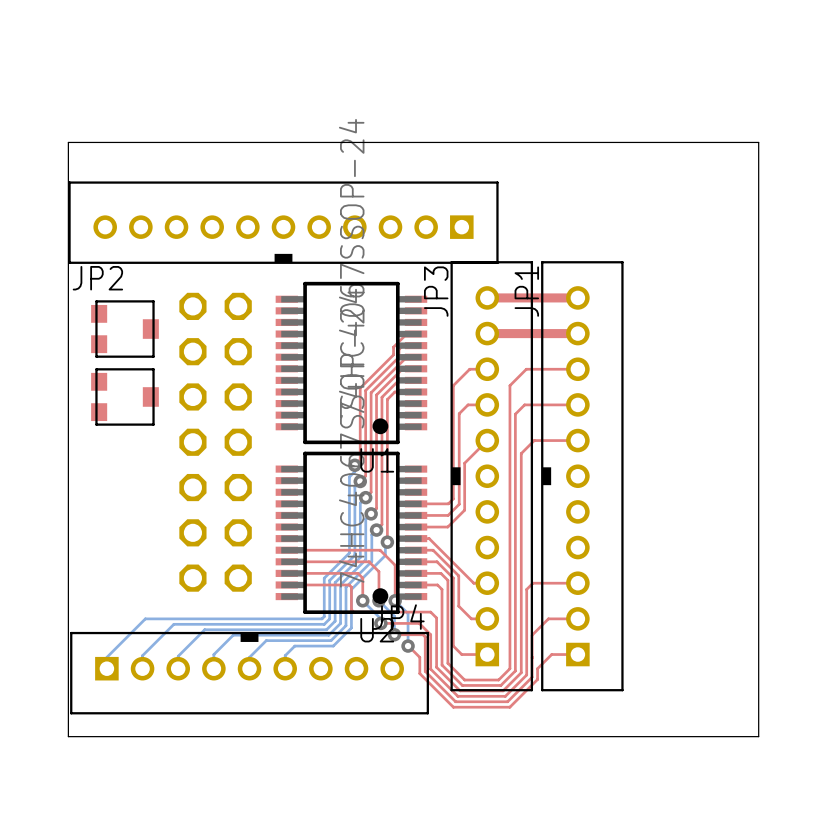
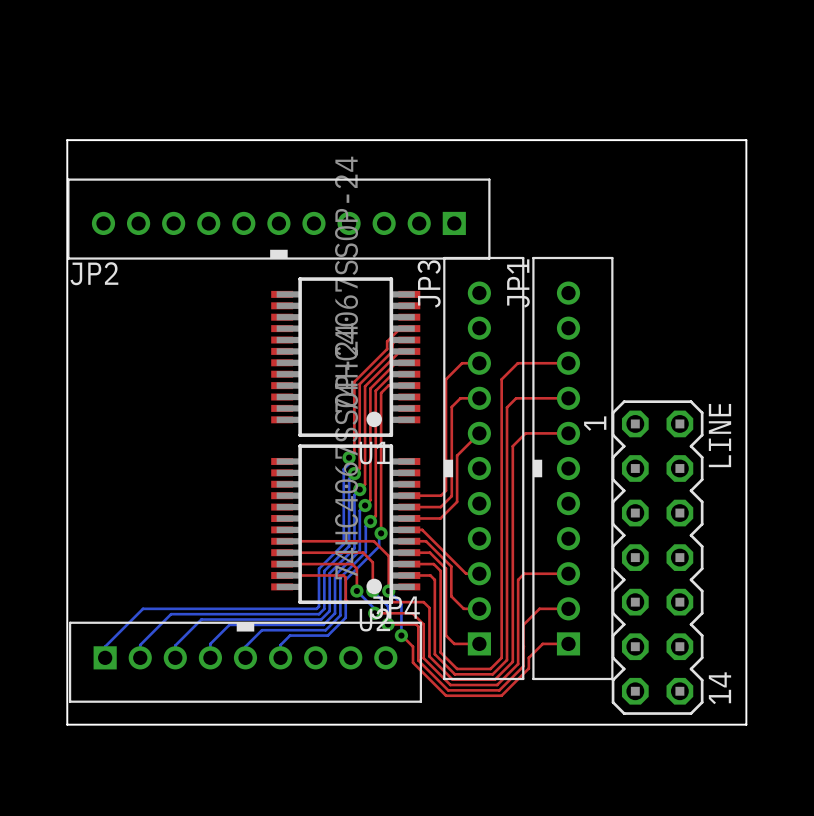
top track: (487, 297) (577, 297) -> none
part: (124, 329) -> none
top track: (487, 333) (577, 333) -> none
part: (124, 396) -> none
part: (215, 442) -> none
LINE: none -> (657, 557)

